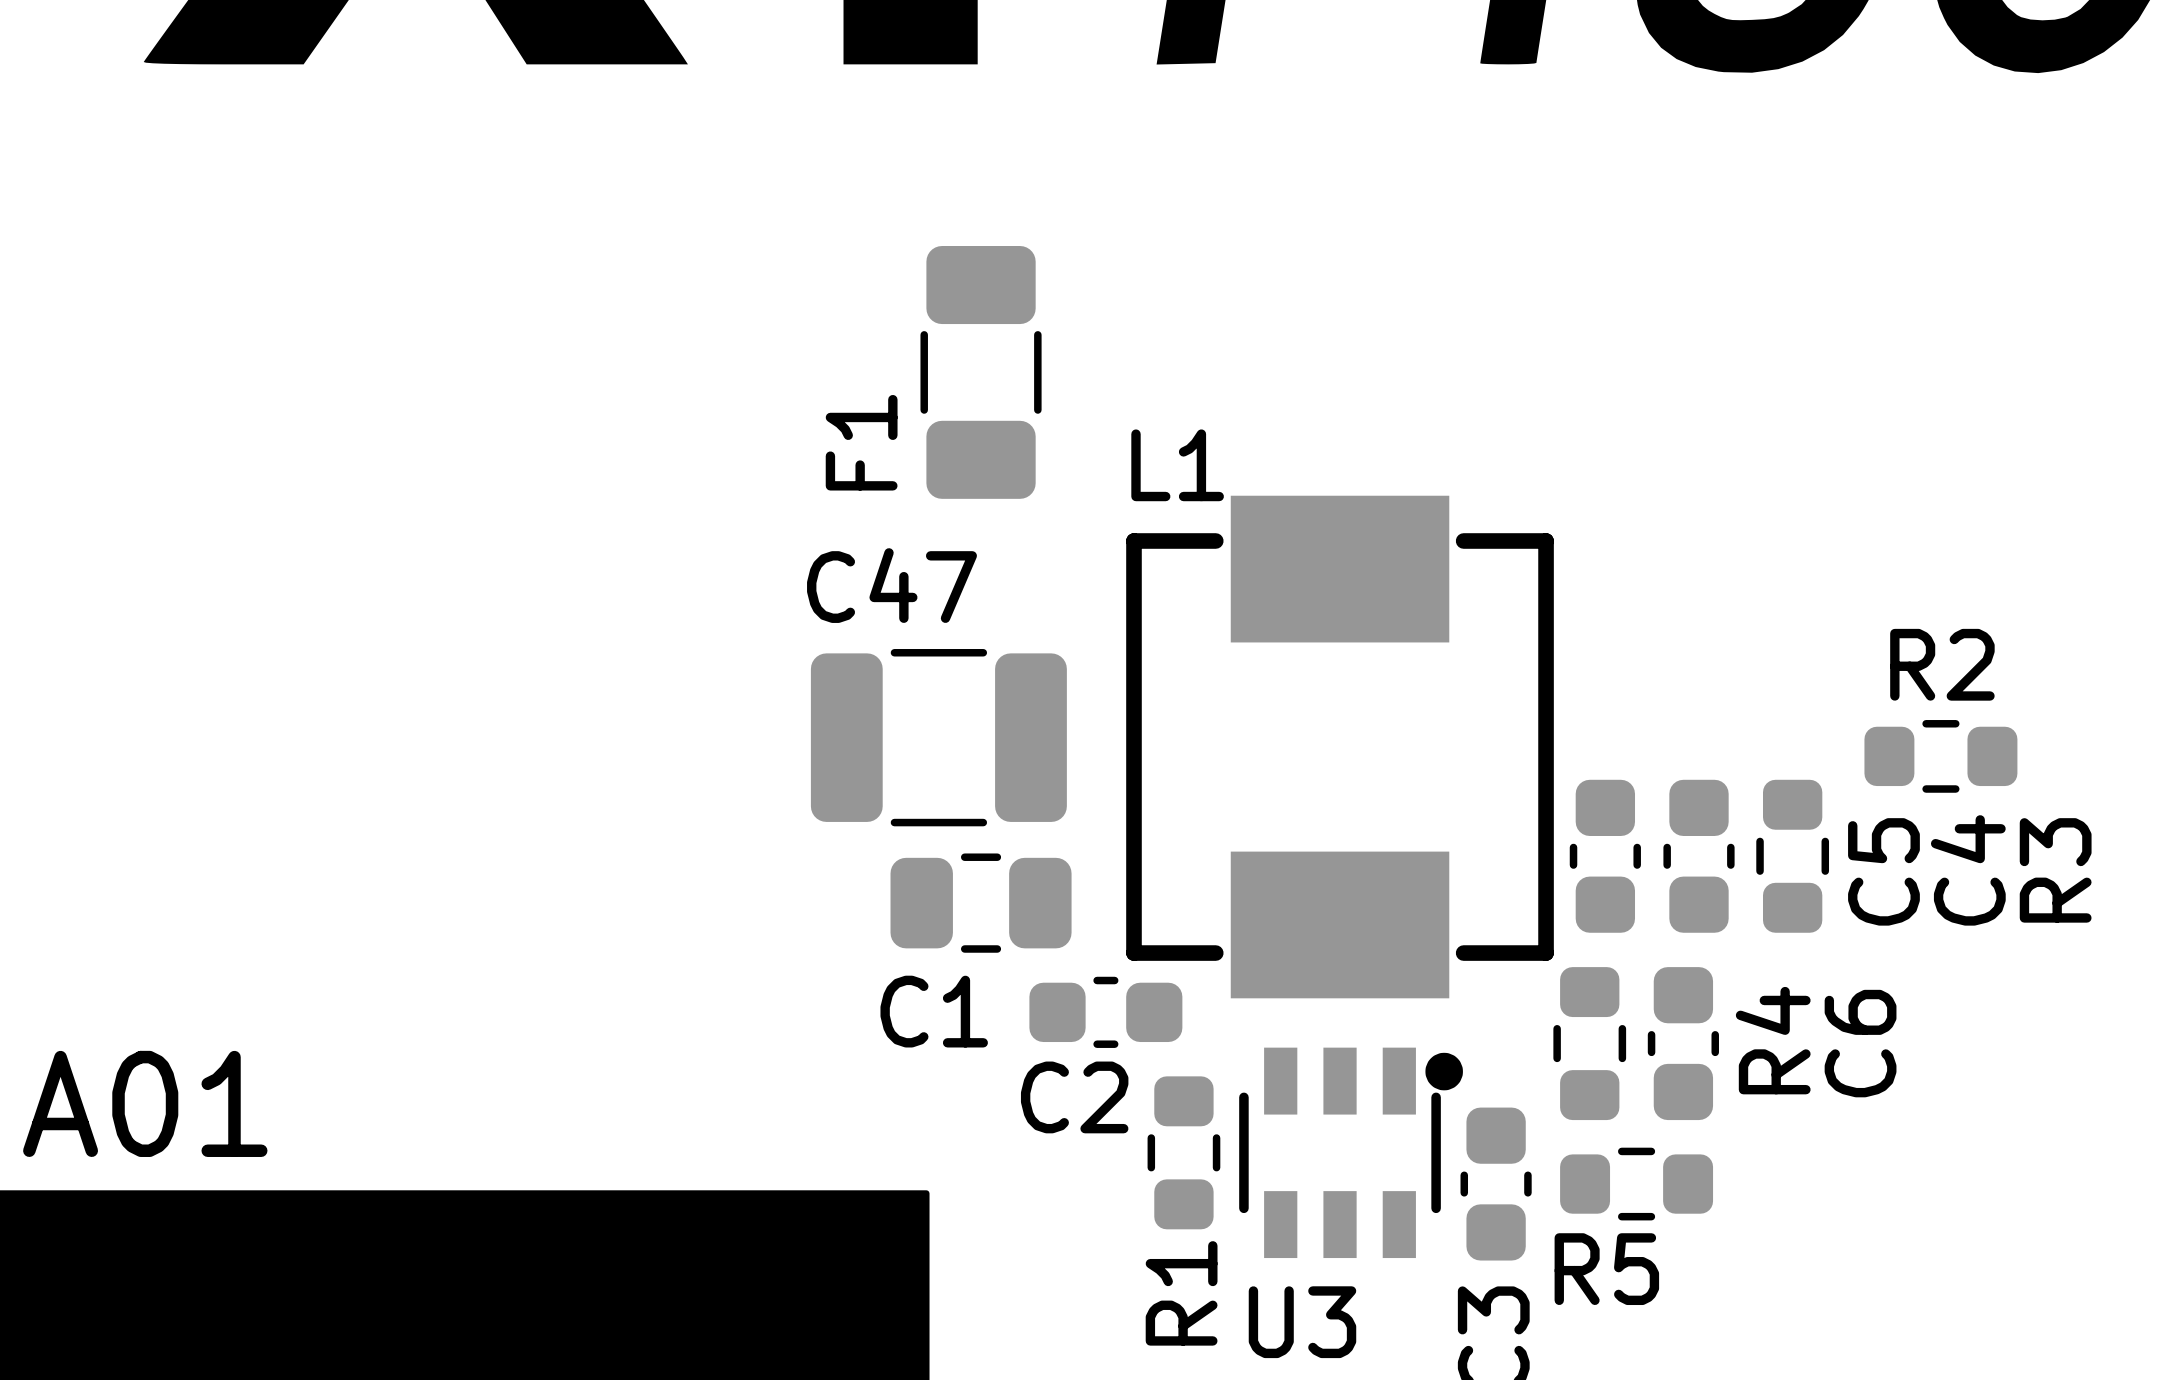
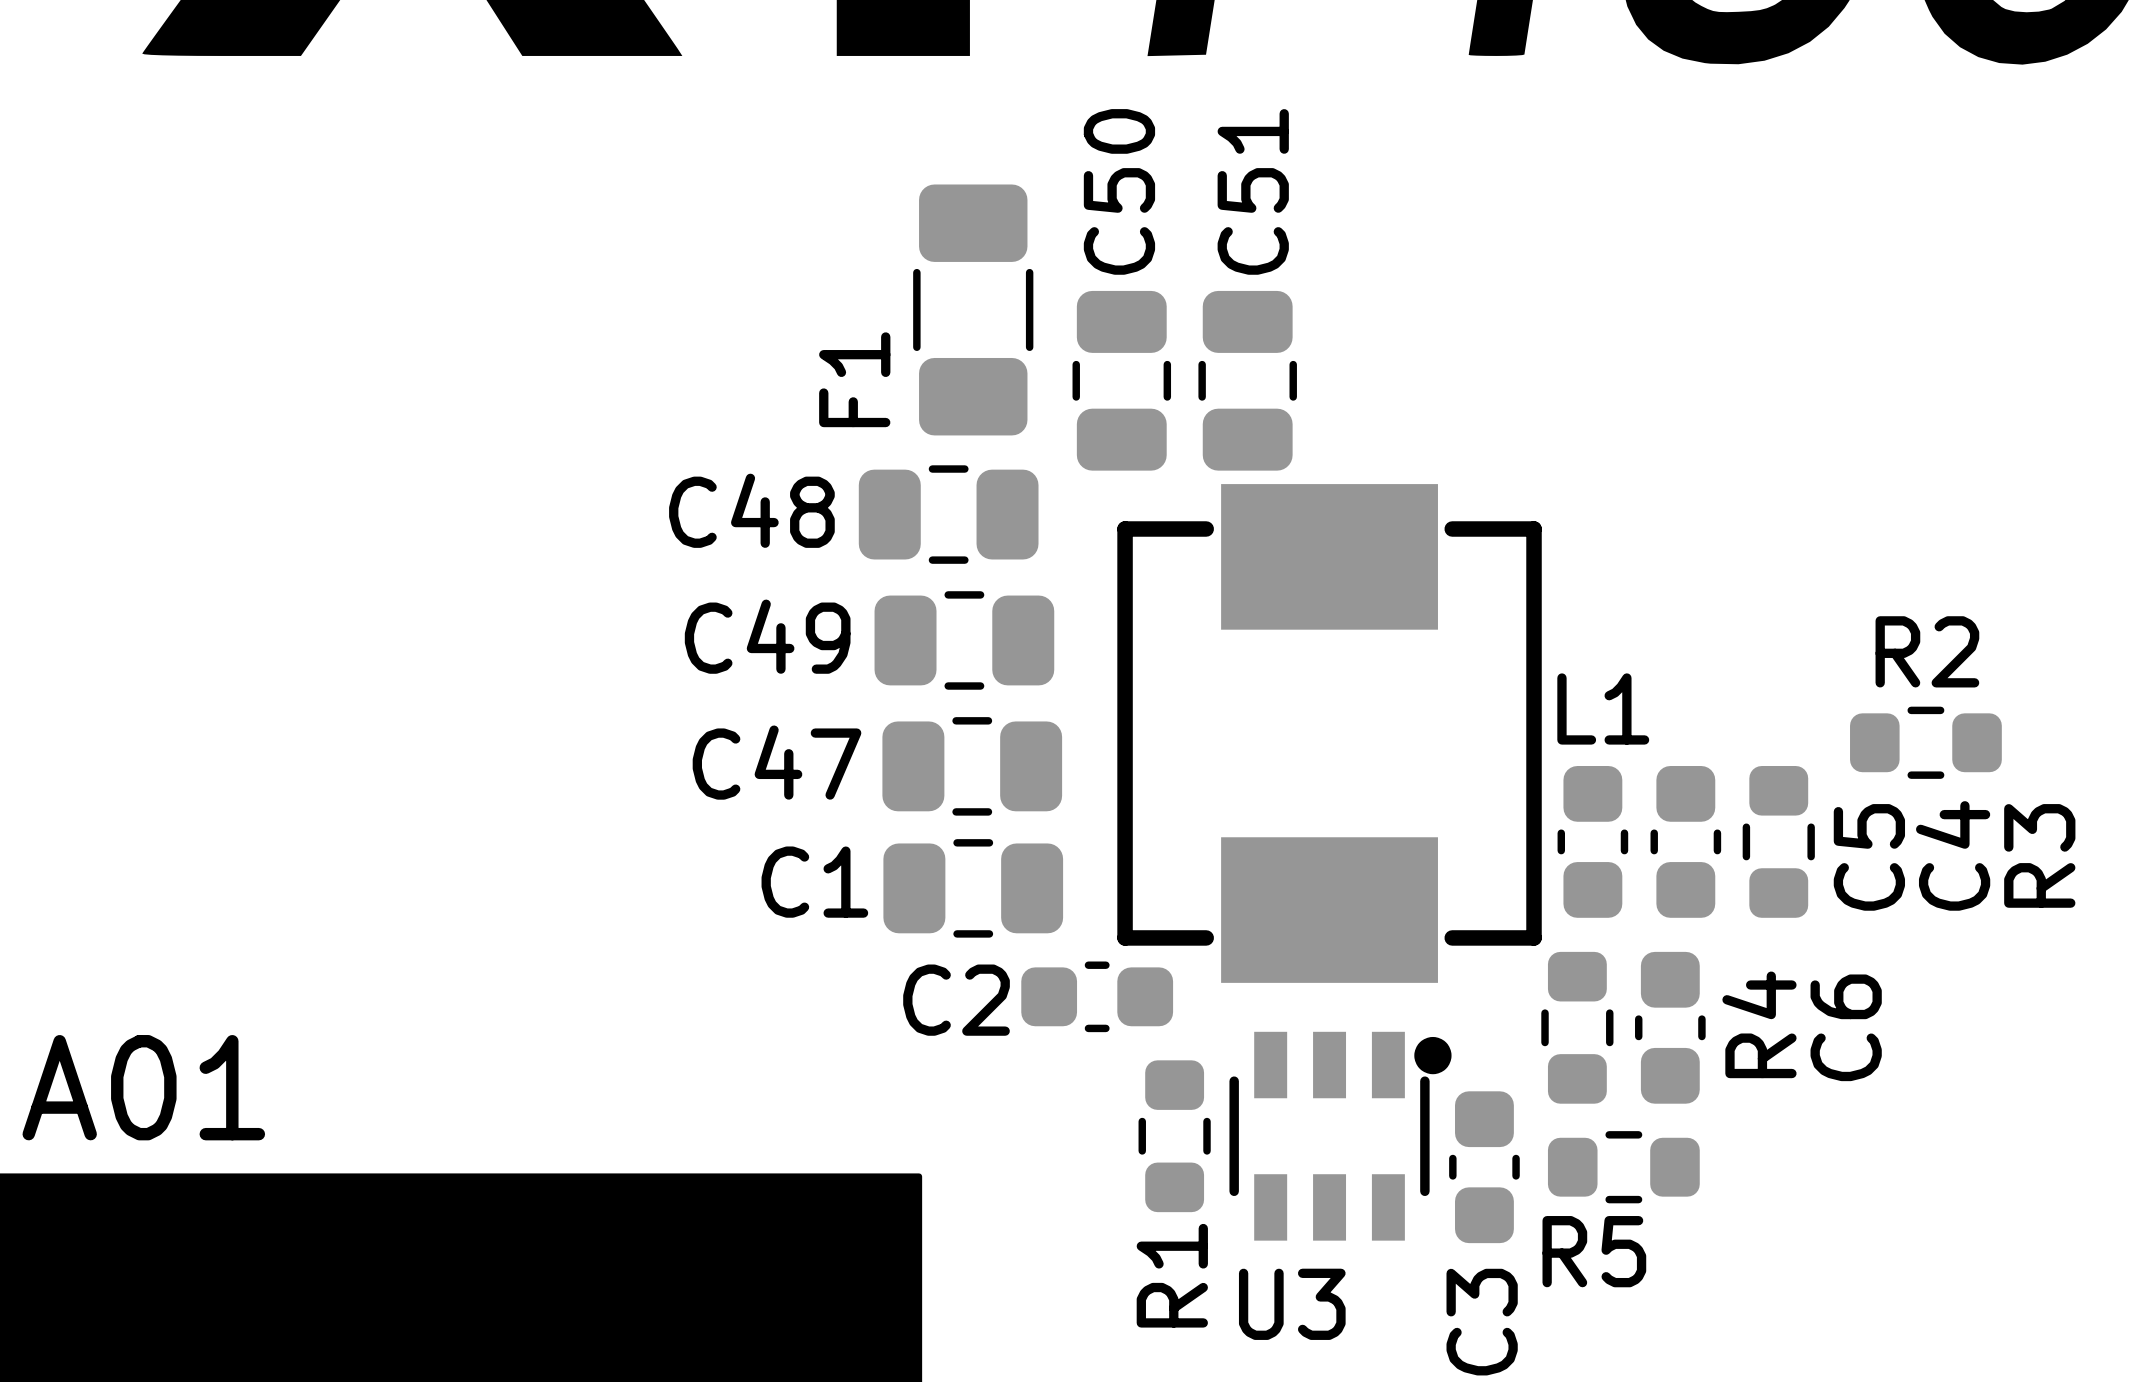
F1 position: (981, 372) -> (973, 309)
C50: none -> (1121, 380)
C51: none -> (1247, 380)
L1 name position: L1 (1177, 465) -> L1 (1603, 708)
C48: none -> (948, 514)
C47 name position: C47 (891, 585) -> C47 (777, 762)
C47 footprint: [810, 649, 1067, 827] -> [882, 717, 1063, 816]
C49: none -> (964, 640)
C1 name position: C1 (934, 1011) -> C1 (814, 882)
C2 name position: C2 (1074, 1097) -> C2 (956, 1000)

